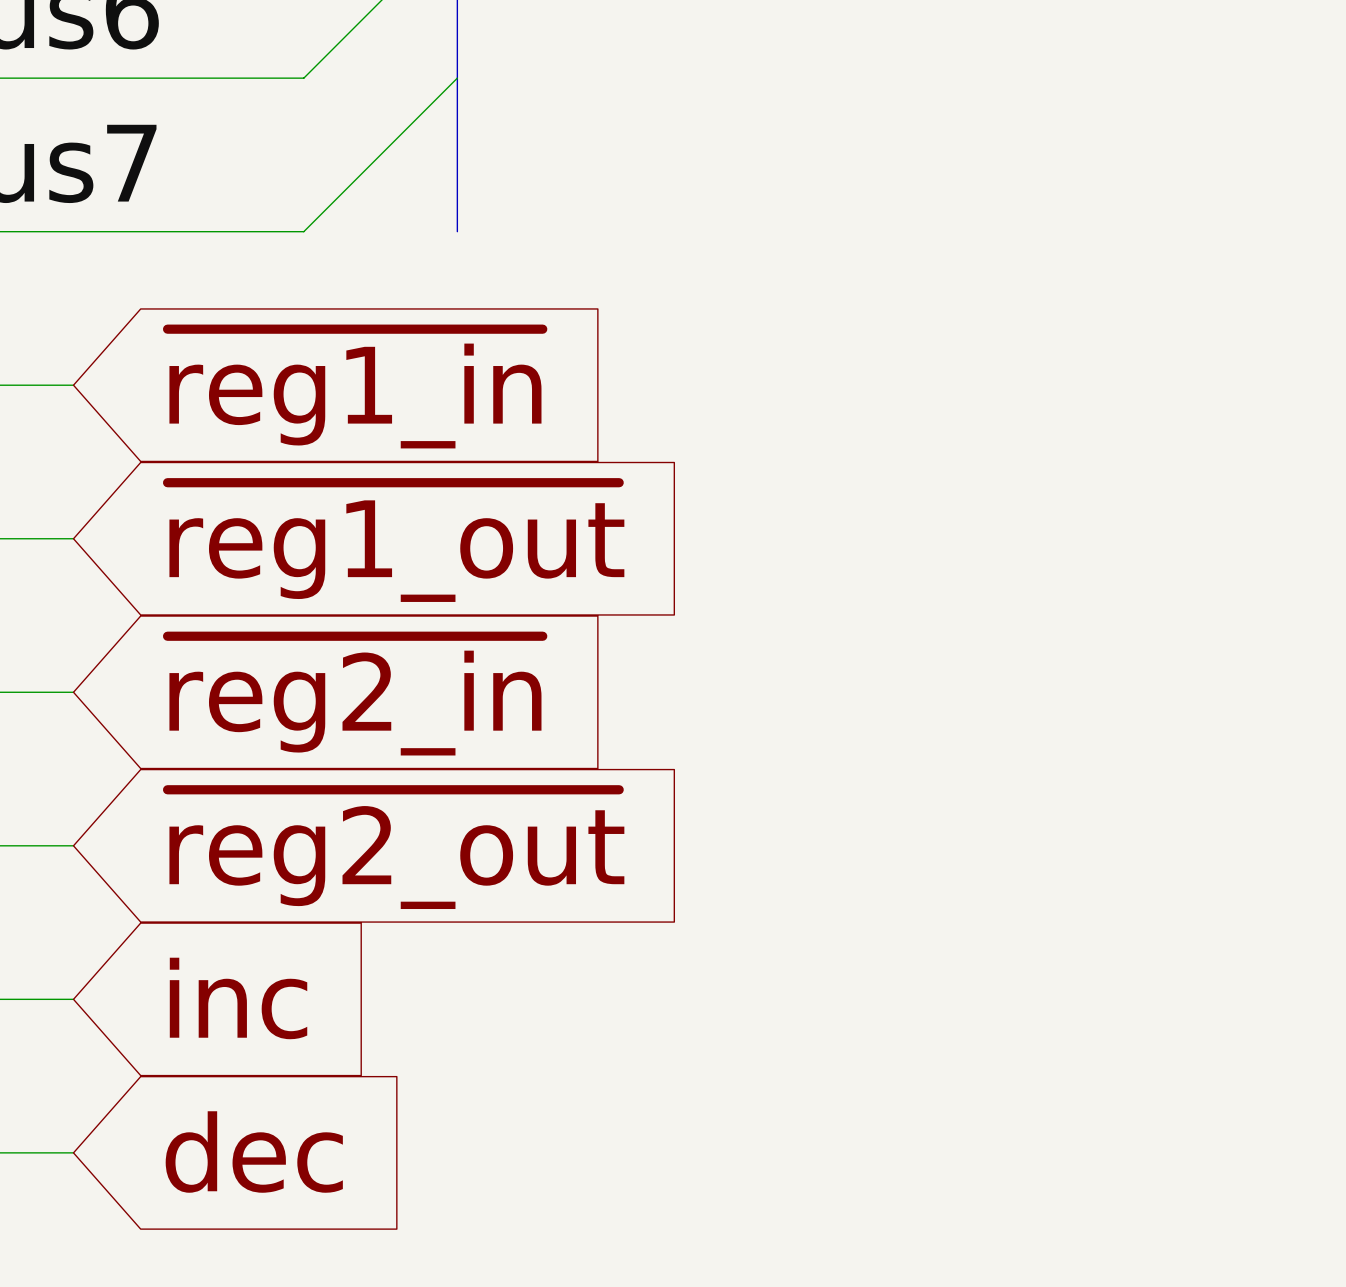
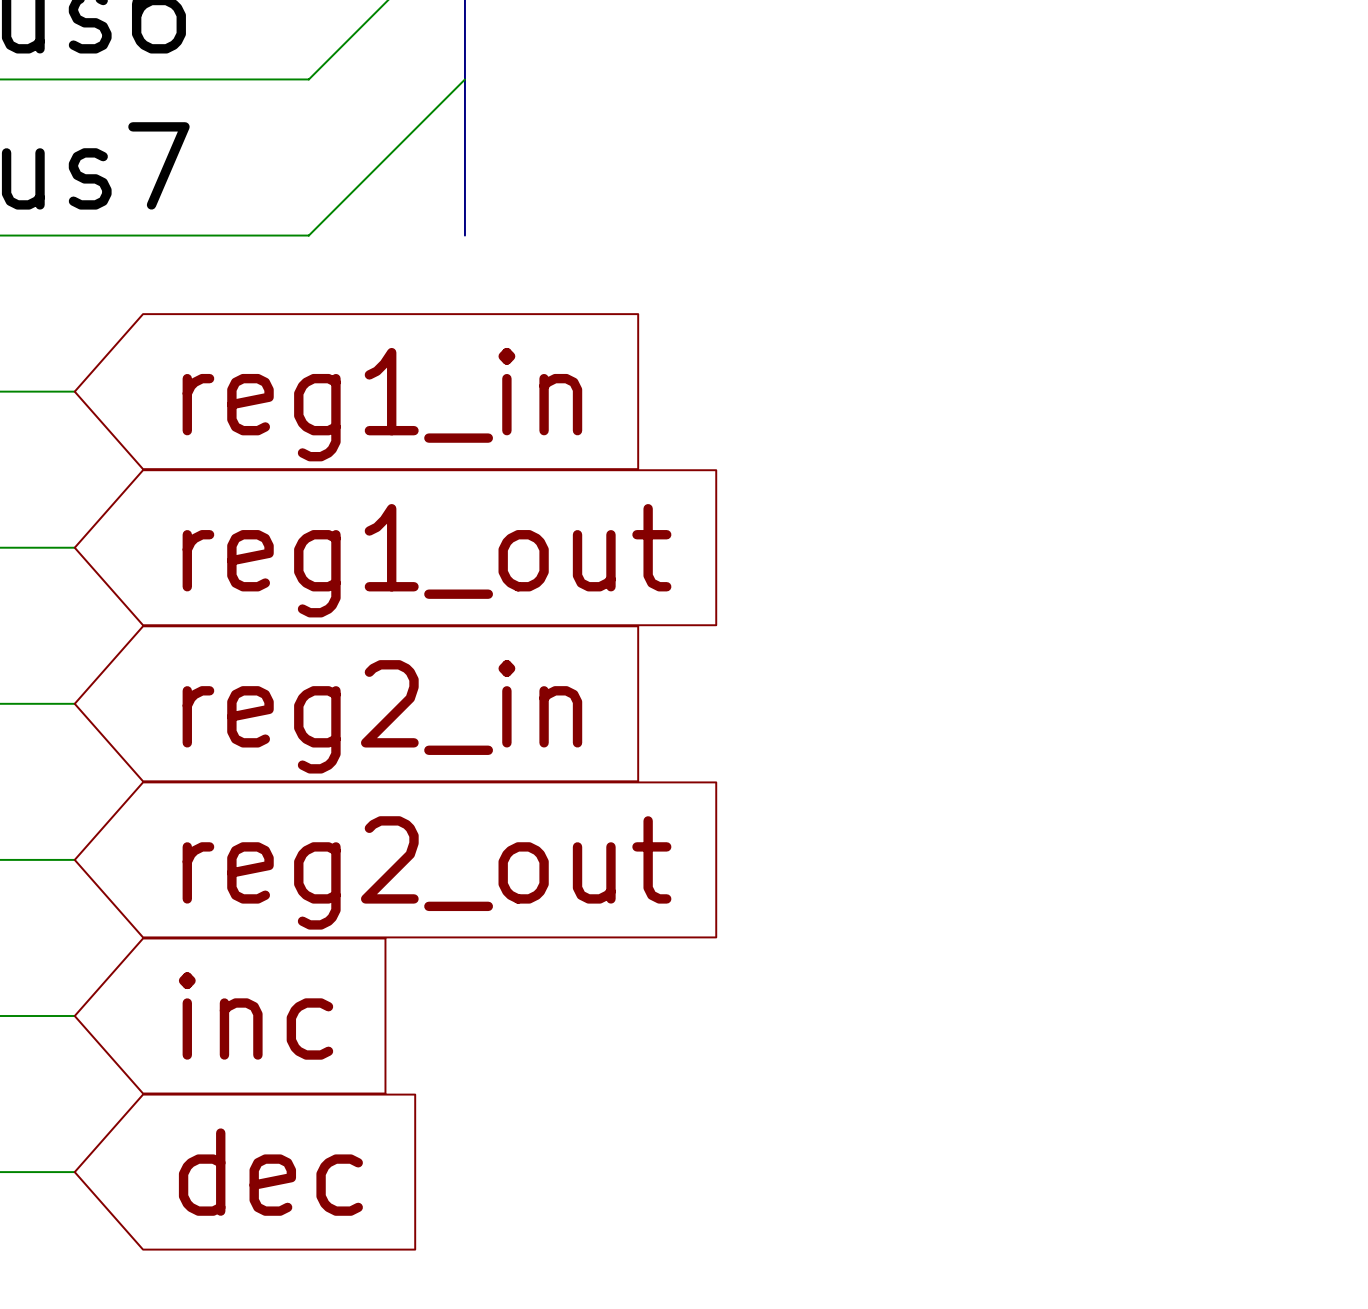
global label: ~{reg1_in} (355, 388) -> reg1_in (382, 404)
global label: ~{reg1_out} (395, 542) -> reg1_out (427, 560)
global label: ~{reg2_in} (355, 695) -> reg2_in (382, 716)
global label: ~{reg2_out} (395, 849) -> reg2_out (427, 872)

